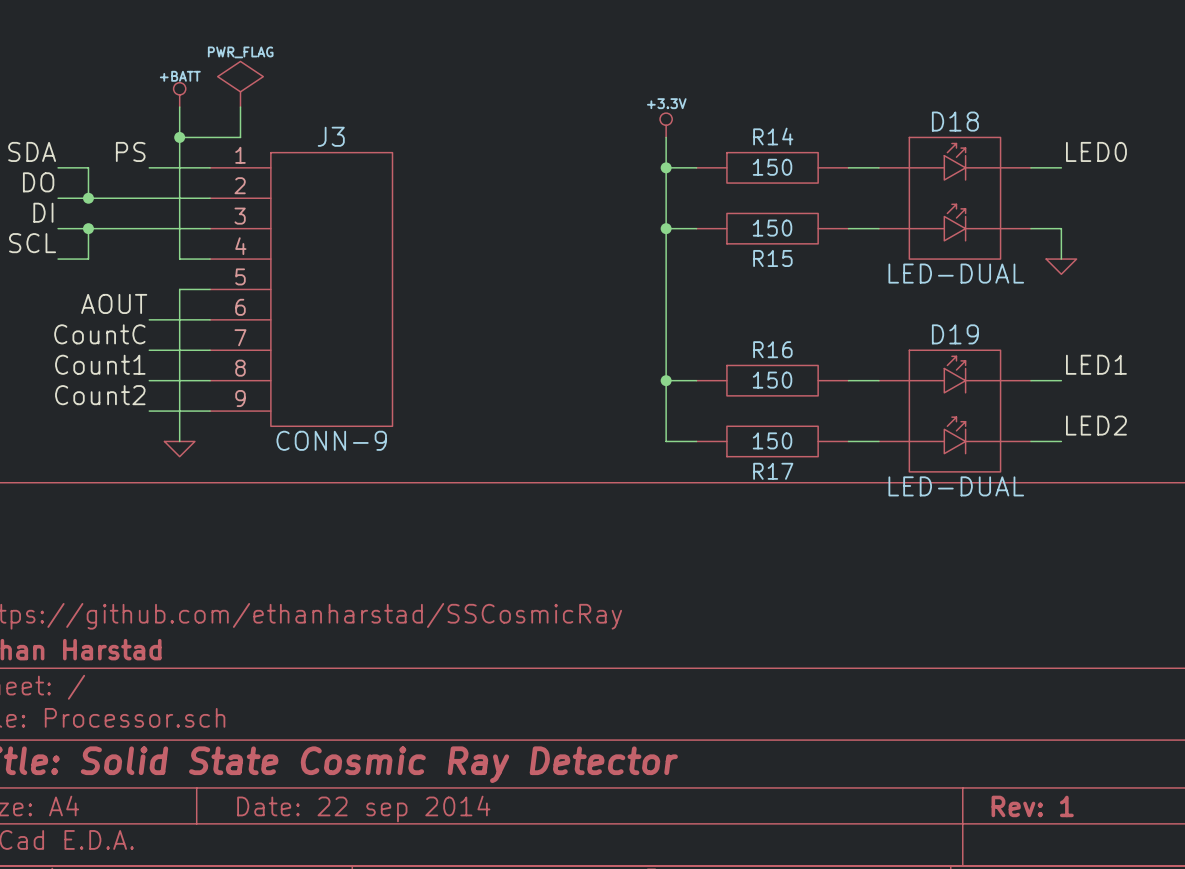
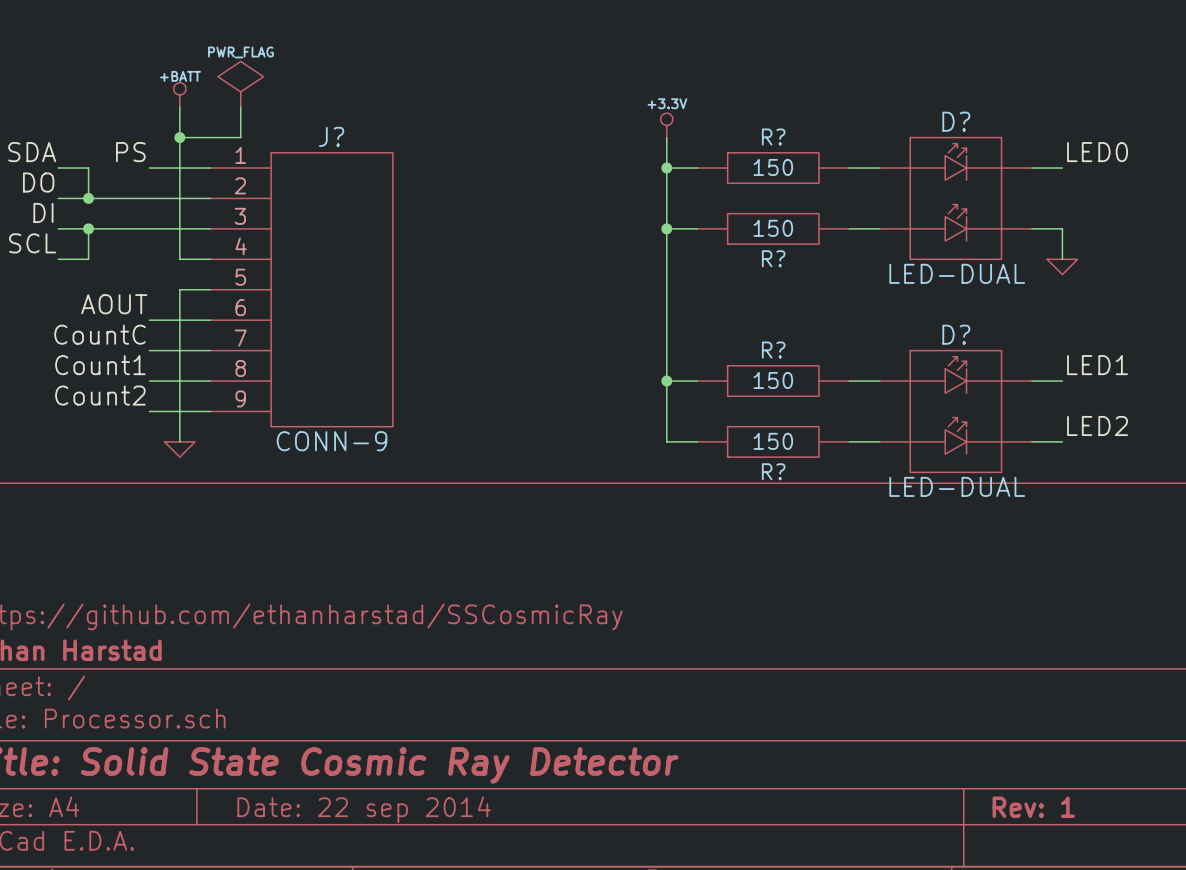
D18 name: D18 (955, 121) -> D? (956, 121)
J3 name: J3 (331, 136) -> J? (331, 136)
R14 name: R14 (773, 136) -> R? (773, 137)
R15 name: R15 (772, 258) -> R? (773, 258)
D19 name: D19 (955, 334) -> D? (956, 334)
R16 name: R16 (772, 349) -> R? (773, 350)
R17 name: R17 (773, 471) -> R? (773, 471)

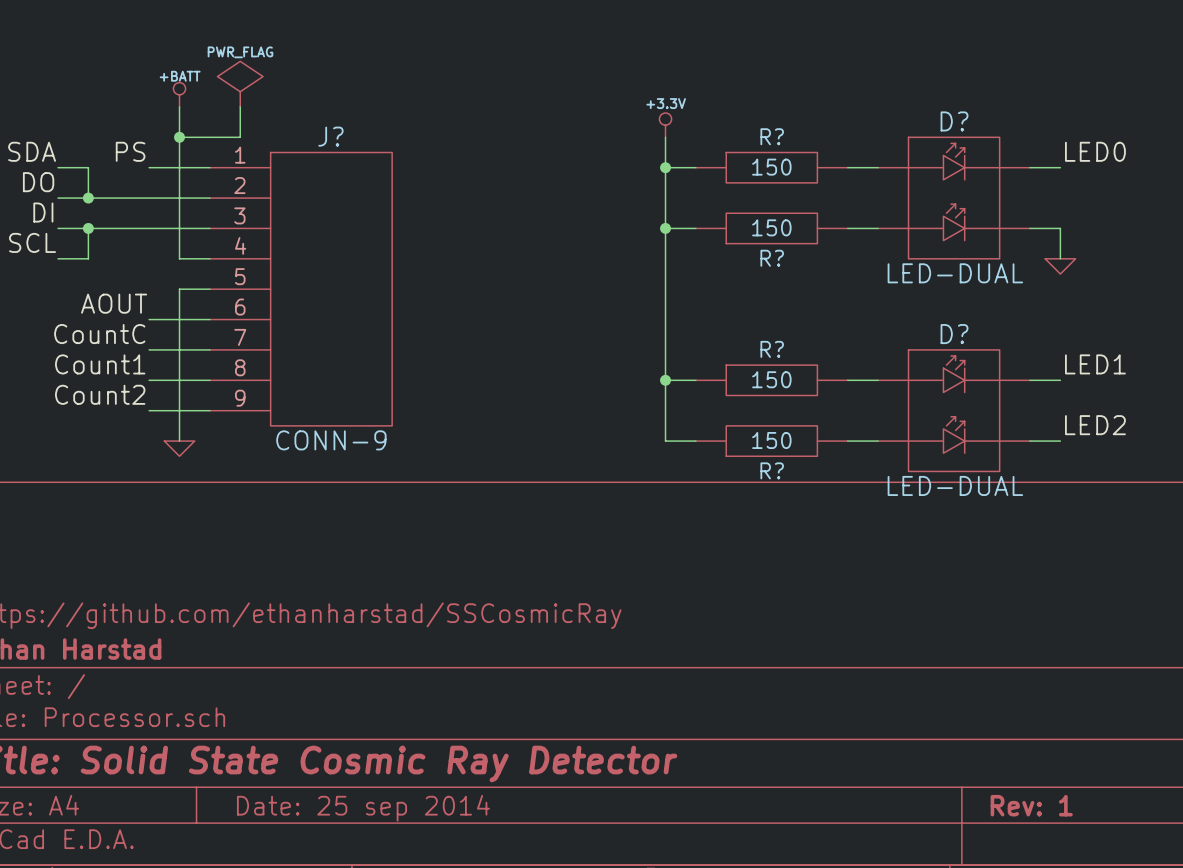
title block: Date: 22 sep 2014 (364, 809) -> Date: 25 sep 2014 (363, 808)

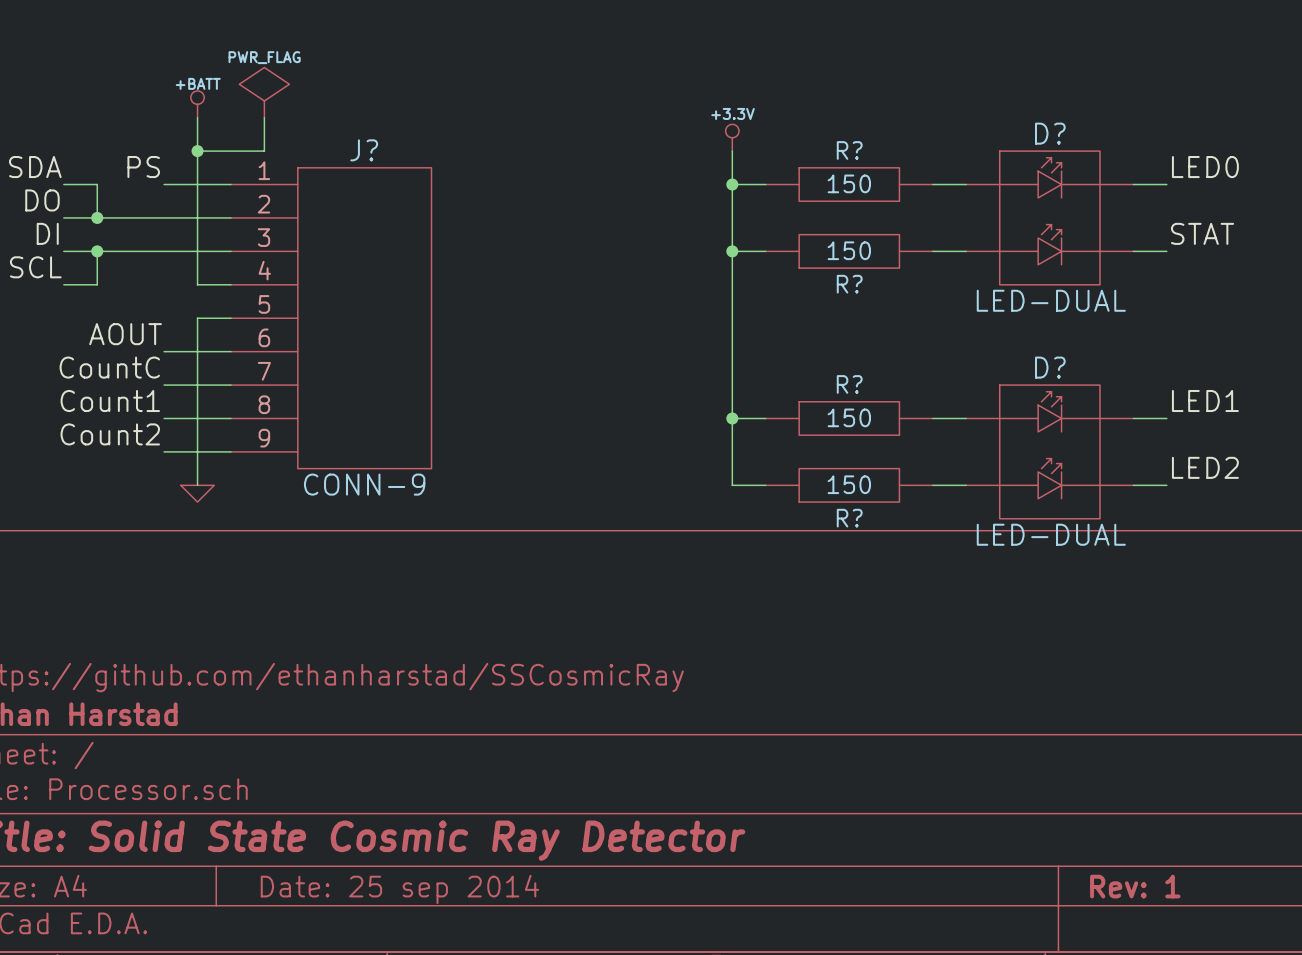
label: none -> STAT (1202, 233)
wire: (1060, 228) (1060, 258) -> none
power symbol: (1060, 266) -> none

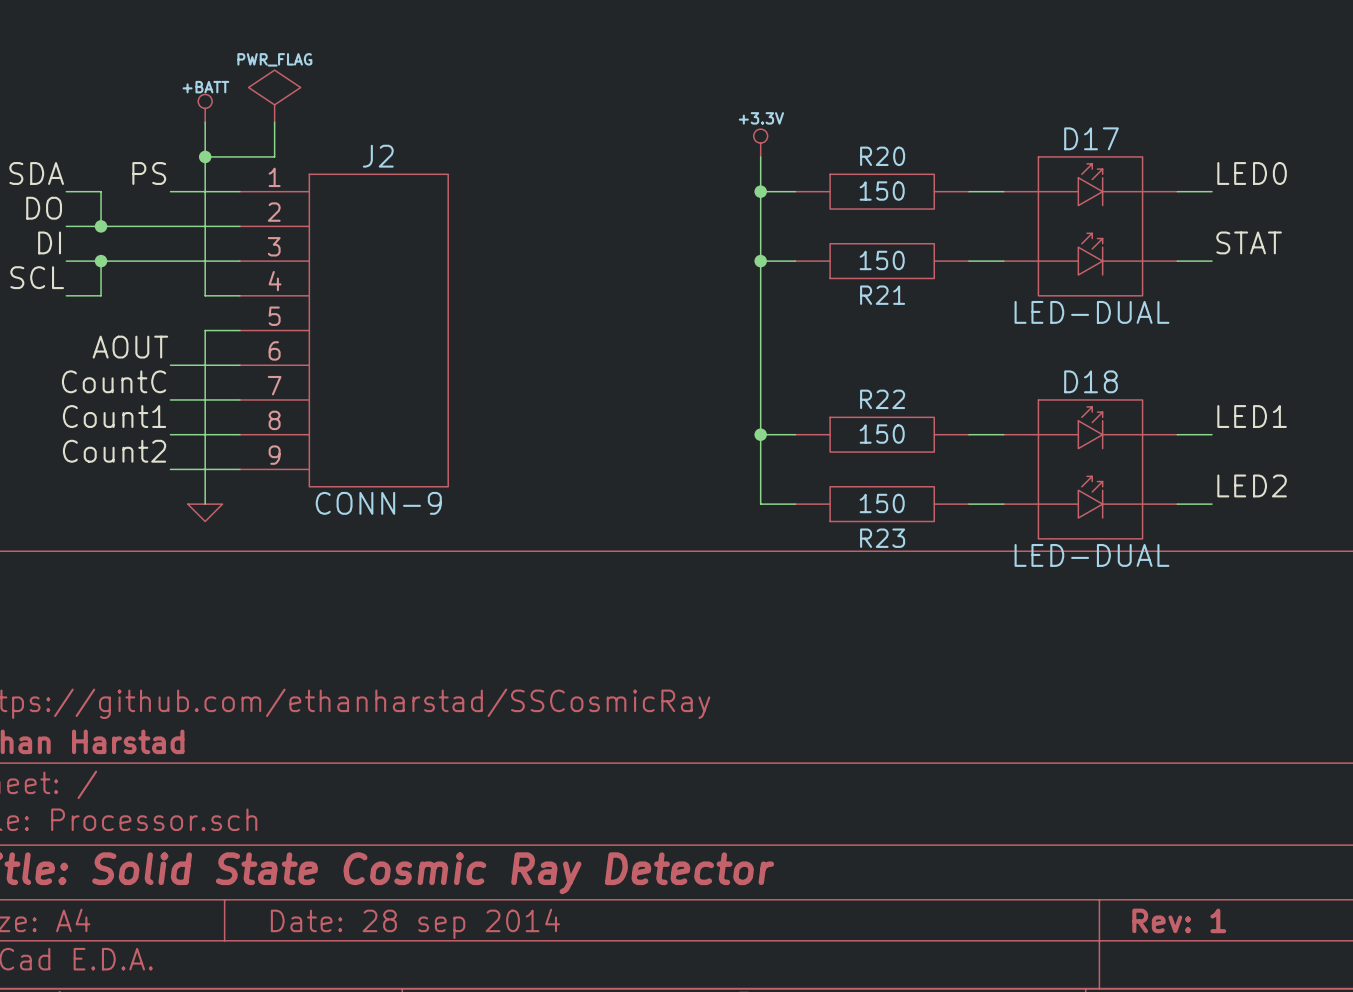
D? name: D? (1050, 133) -> D17 (1091, 138)
J? name: J? (364, 150) -> J2 (378, 156)
R? name: R? (849, 150) -> R20 (882, 156)
R? name: R? (849, 284) -> R21 (882, 295)
D? name: D? (1050, 367) -> D18 (1090, 381)
R? name: R? (849, 384) -> R22 (882, 399)
R? name: R? (849, 518) -> R23 (882, 538)
title block: Date: 25 sep 2014 (399, 889) -> Date: 28 sep 2014 (415, 923)

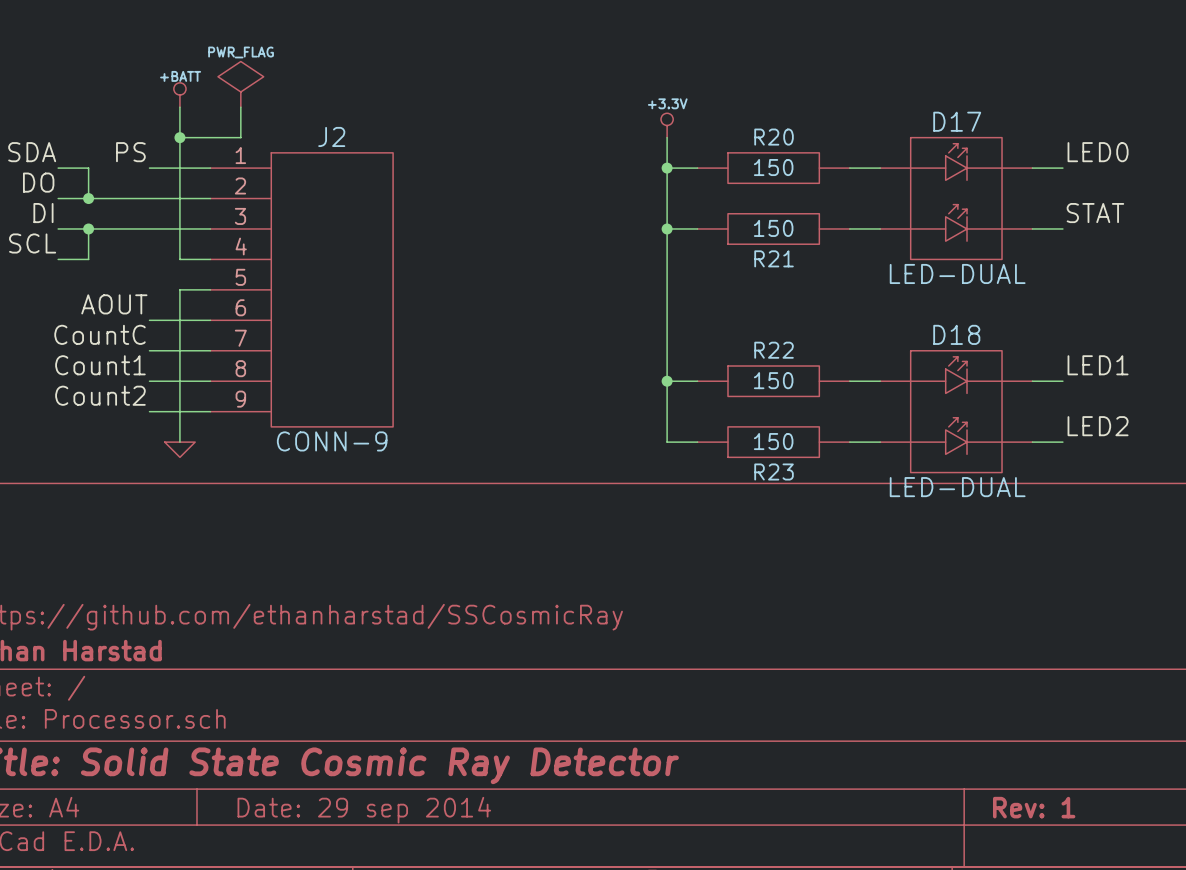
title block: Date: 28 sep 2014 (415, 923) -> Date: 29 sep 2014 (364, 810)

